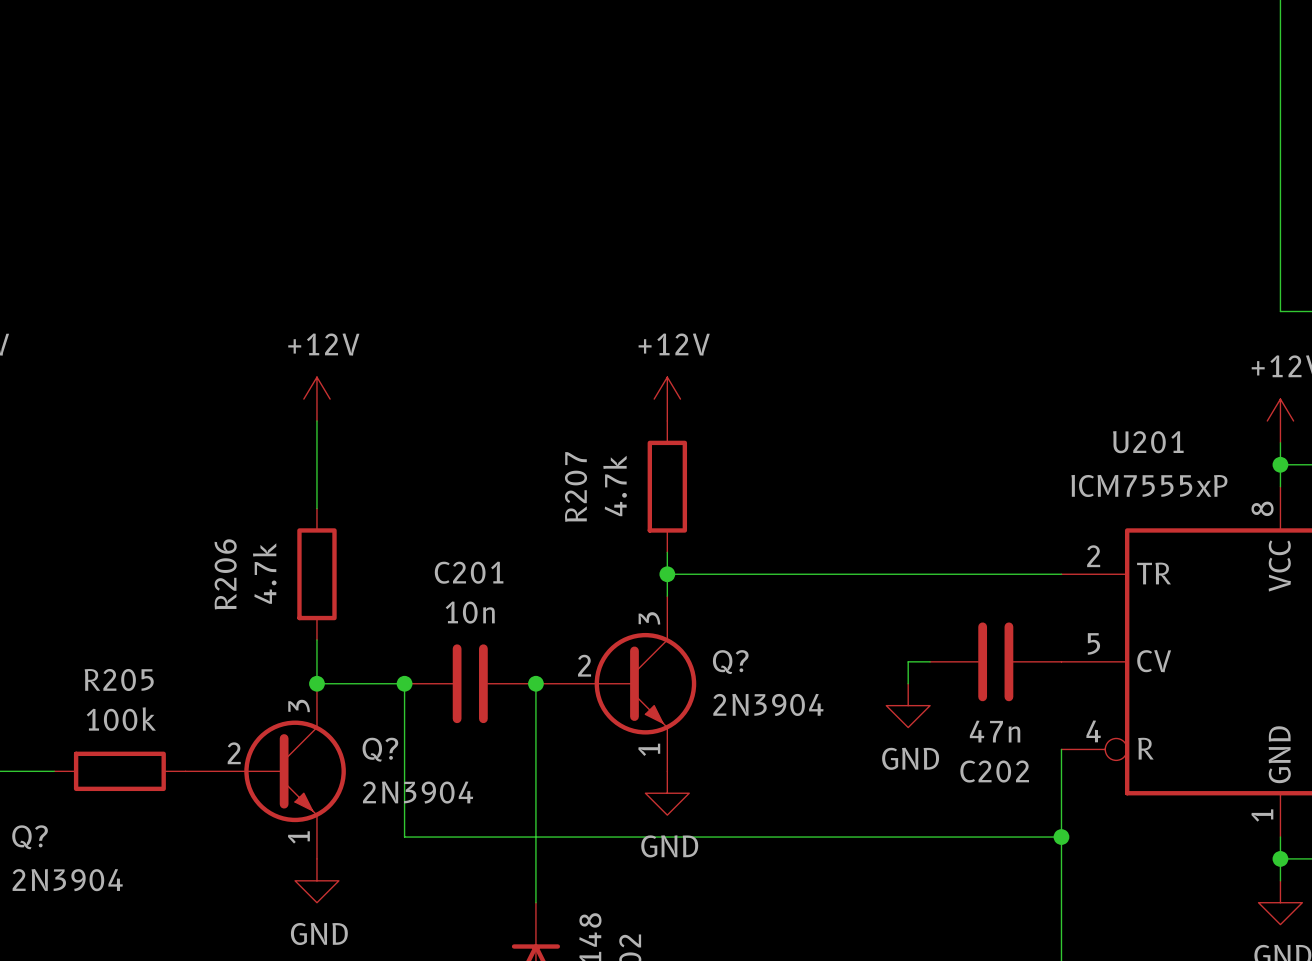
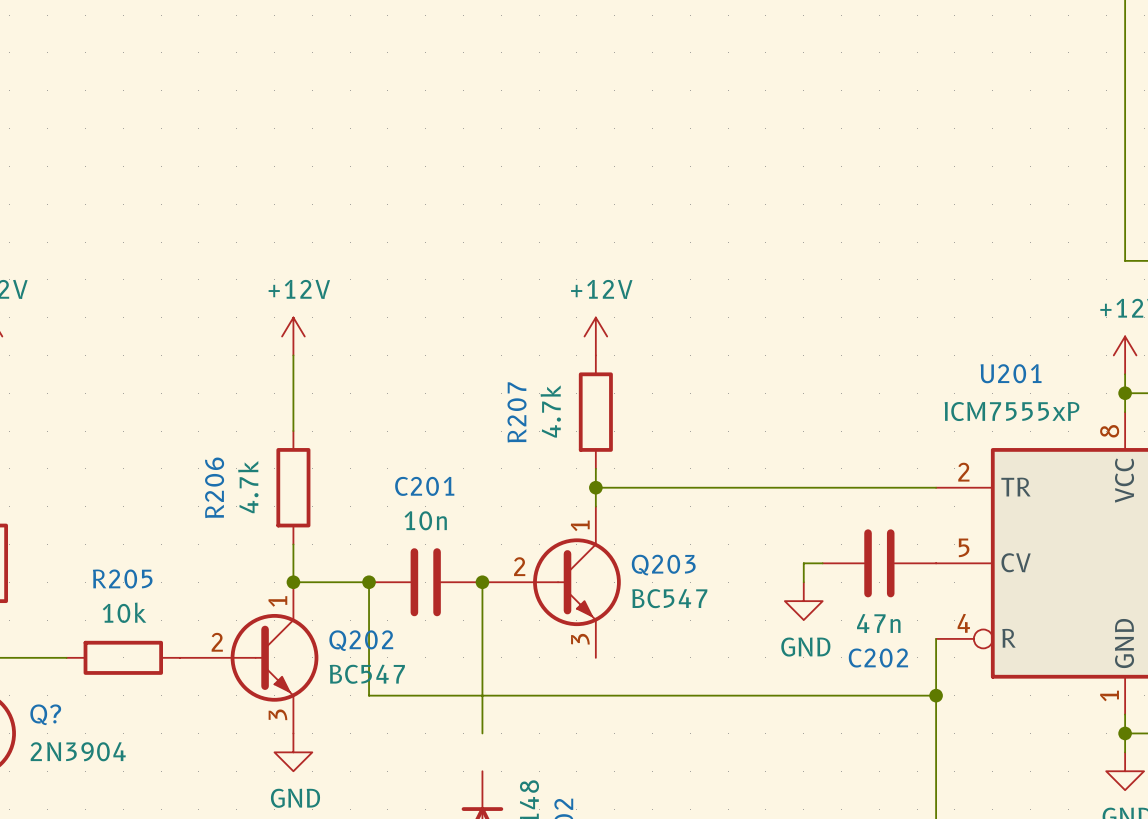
Q?: 2N3904 (616, 683) -> none
Q203: none -> BC547 (551, 582)
R205 value: 100k (121, 719) -> 10k (124, 612)
Q?: 2N3904 (265, 771) -> none
Q202: none -> BC547 (249, 657)
power symbol: GND (667, 793) -> none
wire: (404, 815) (404, 837) (1061, 837) -> (369, 695) (936, 695)
junction position: (1061, 837) -> (936, 695)
wire: (535, 858) (535, 902) -> none

